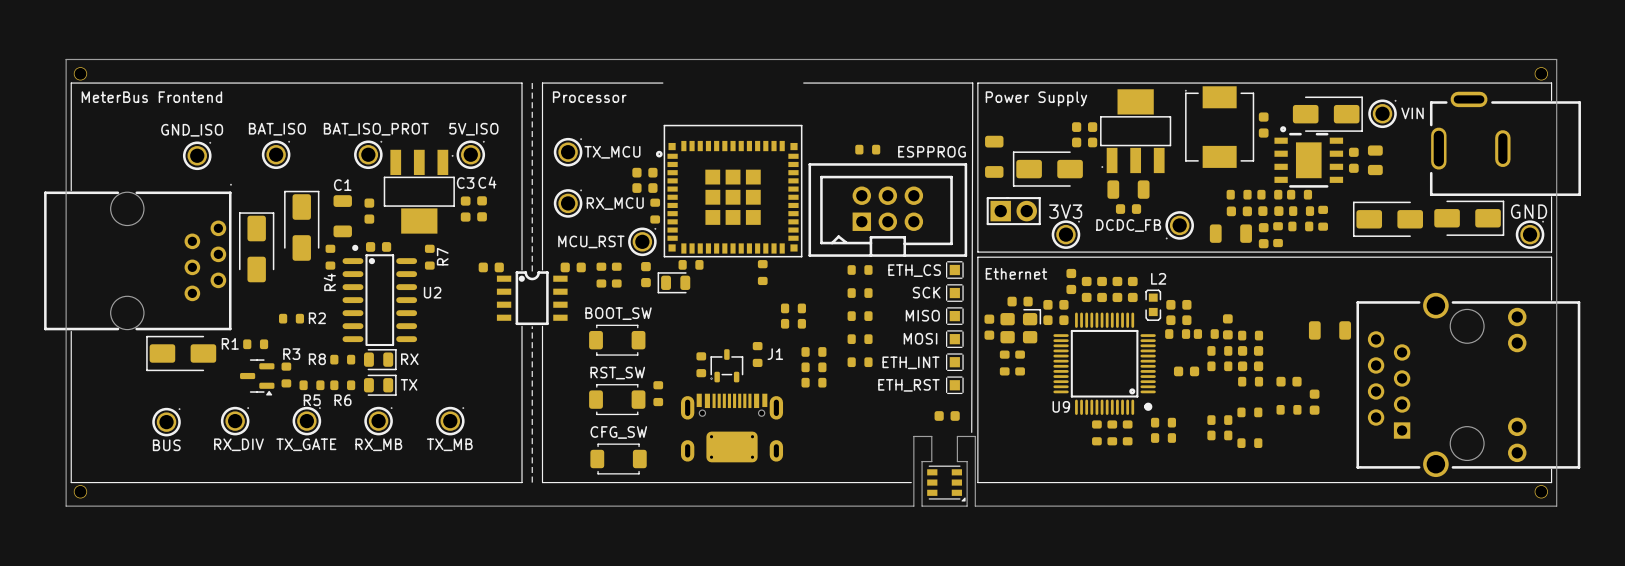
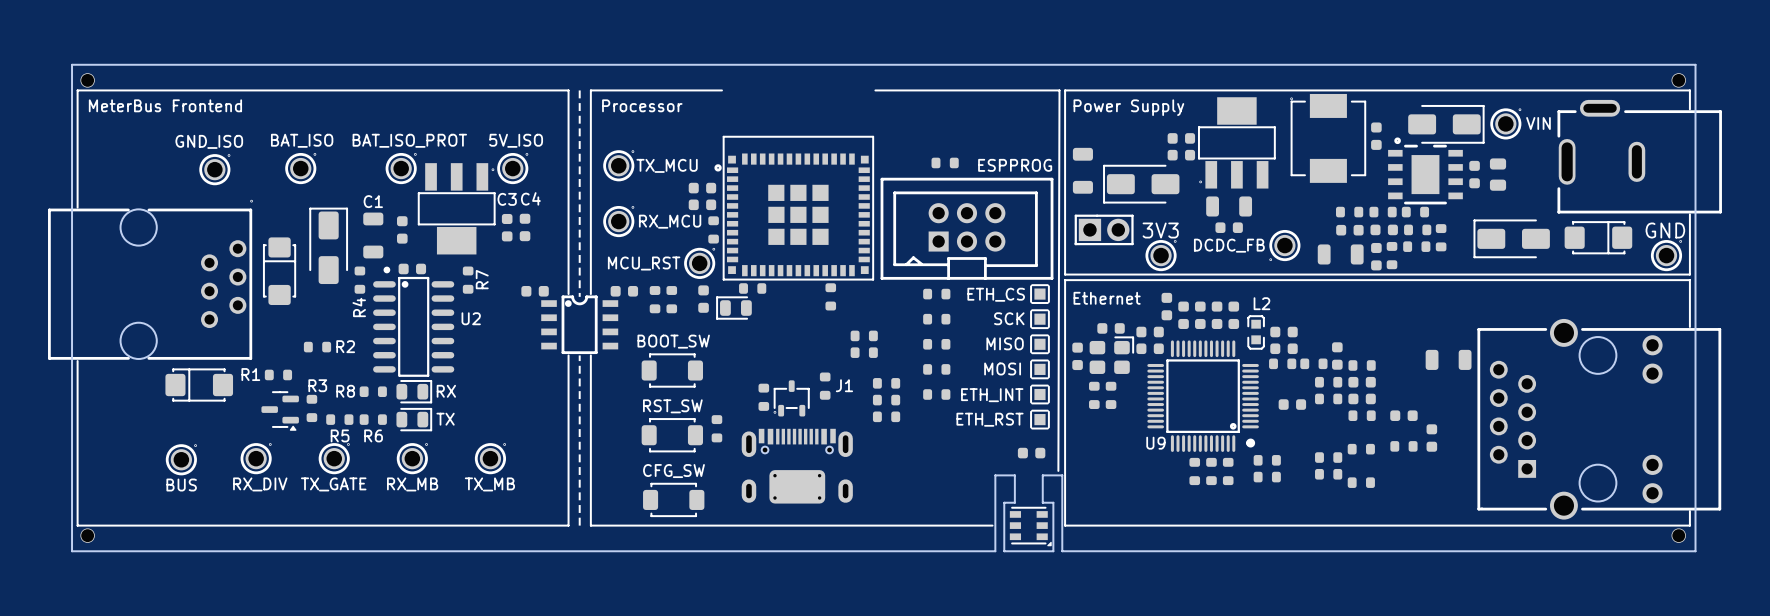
part footprint: [1434, 200, 1505, 236] -> [1564, 221, 1633, 255]
part footprint: [239, 212, 275, 283] -> [263, 237, 297, 306]
part footprint: [146, 335, 217, 372] -> [165, 368, 234, 402]

